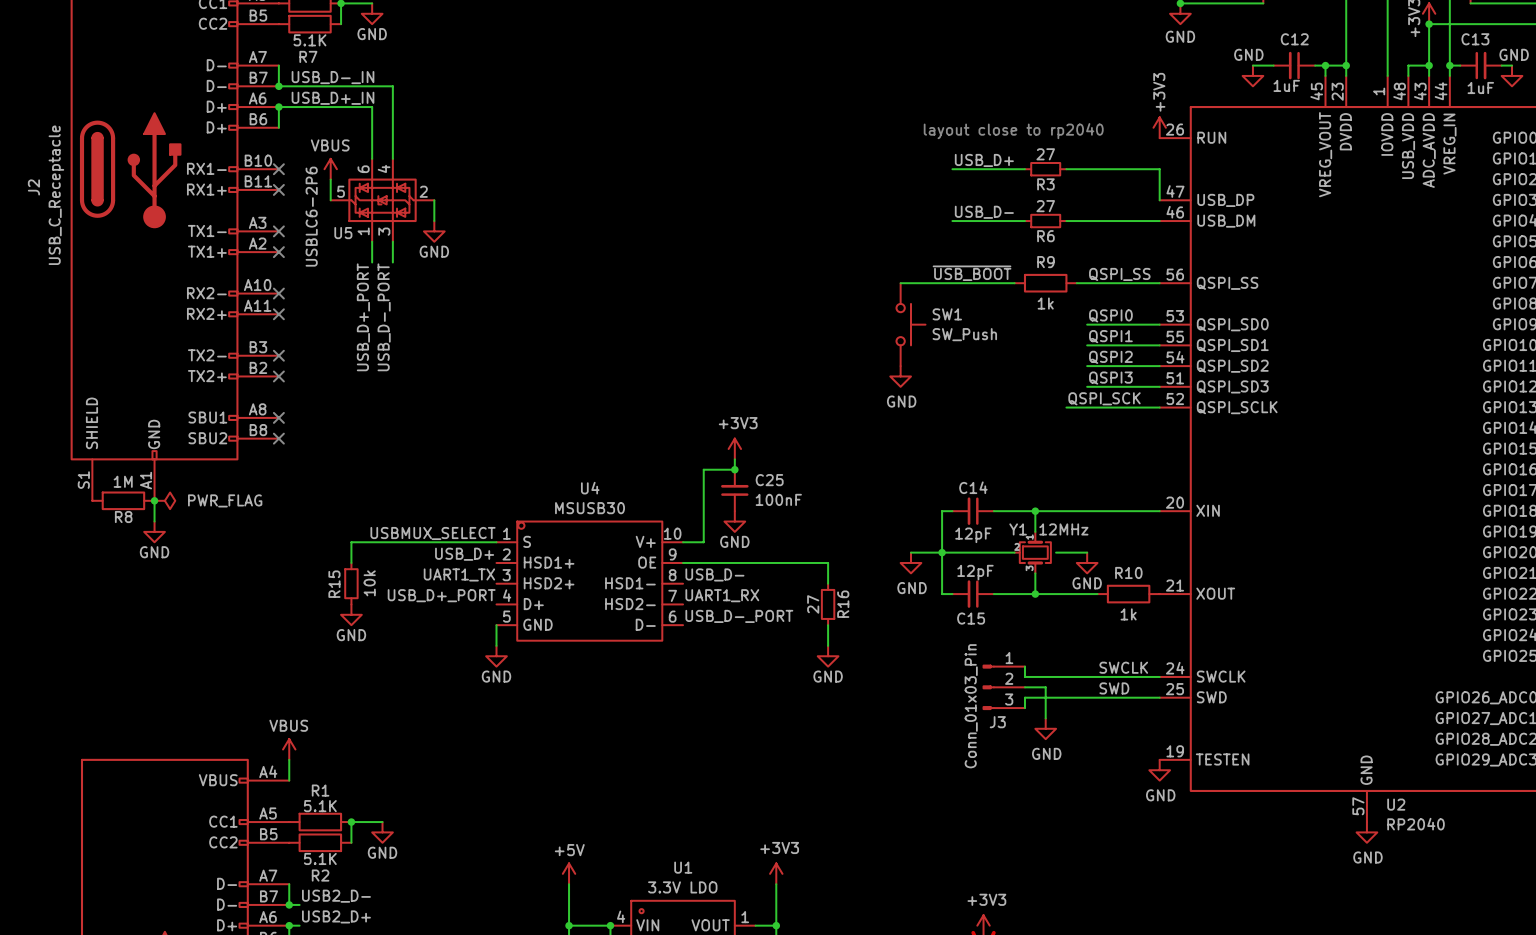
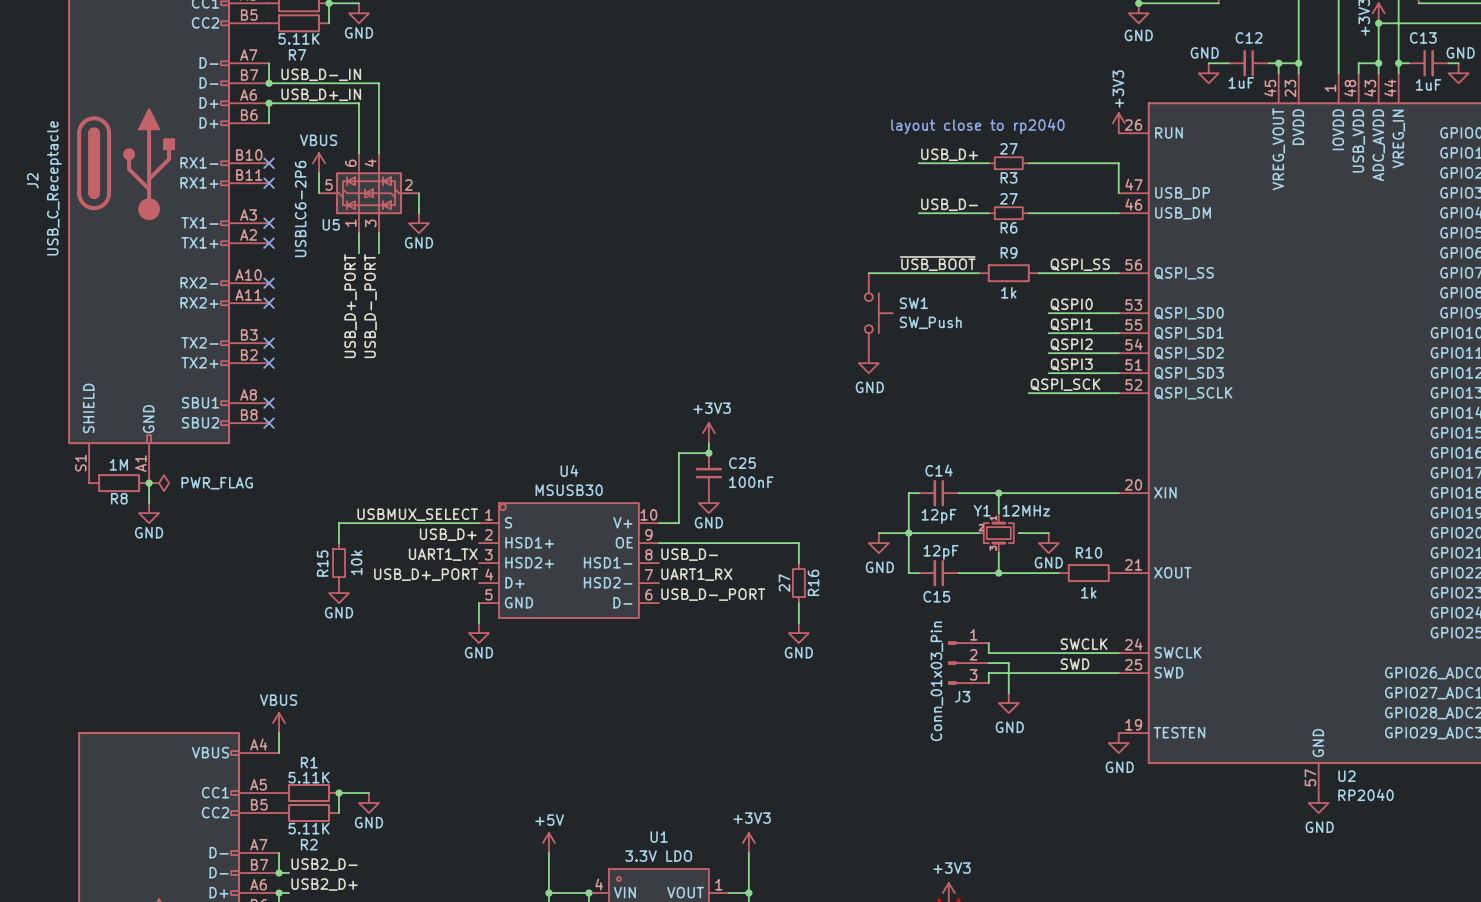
R7 value: 5.1K (309, 40) -> 5.11K (299, 38)
R1 value: 5.1K (320, 806) -> 5.11K (309, 777)
R2 value: 5.1K (320, 858) -> 5.11K (309, 828)

